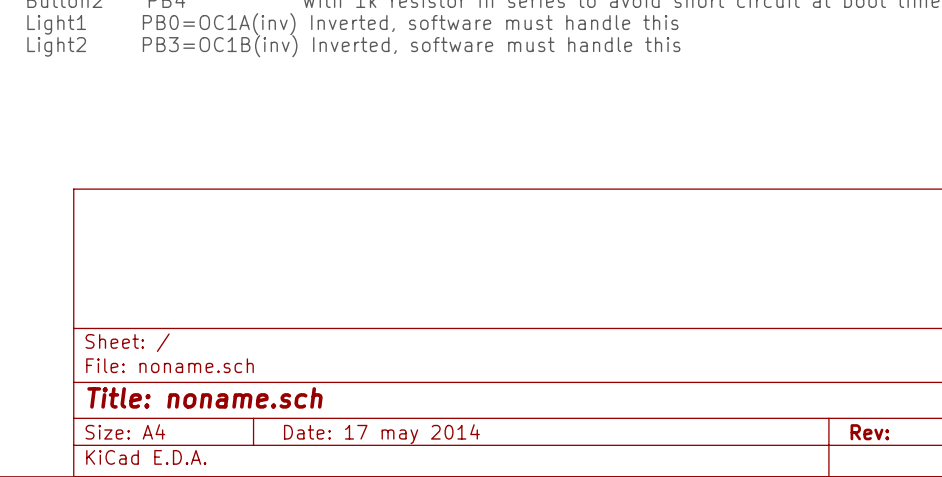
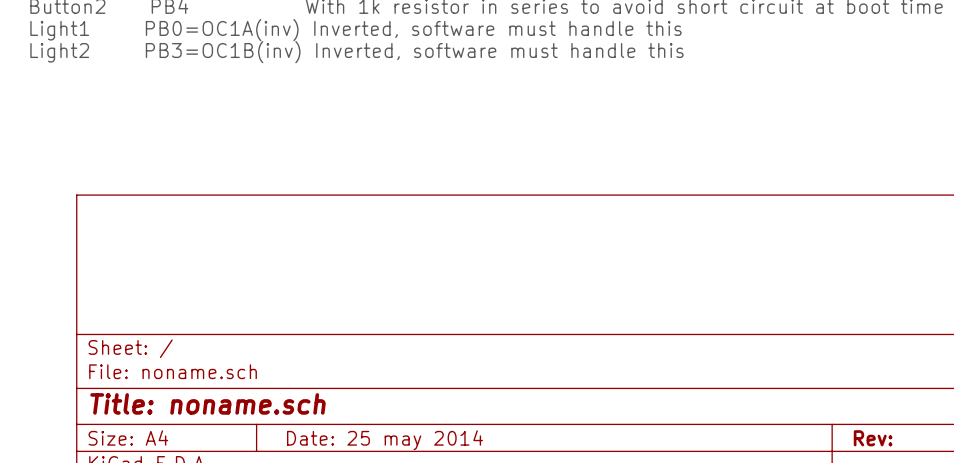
title block: Date: 17 may 2014 (381, 434) -> Date: 25 may 2014 (385, 440)

